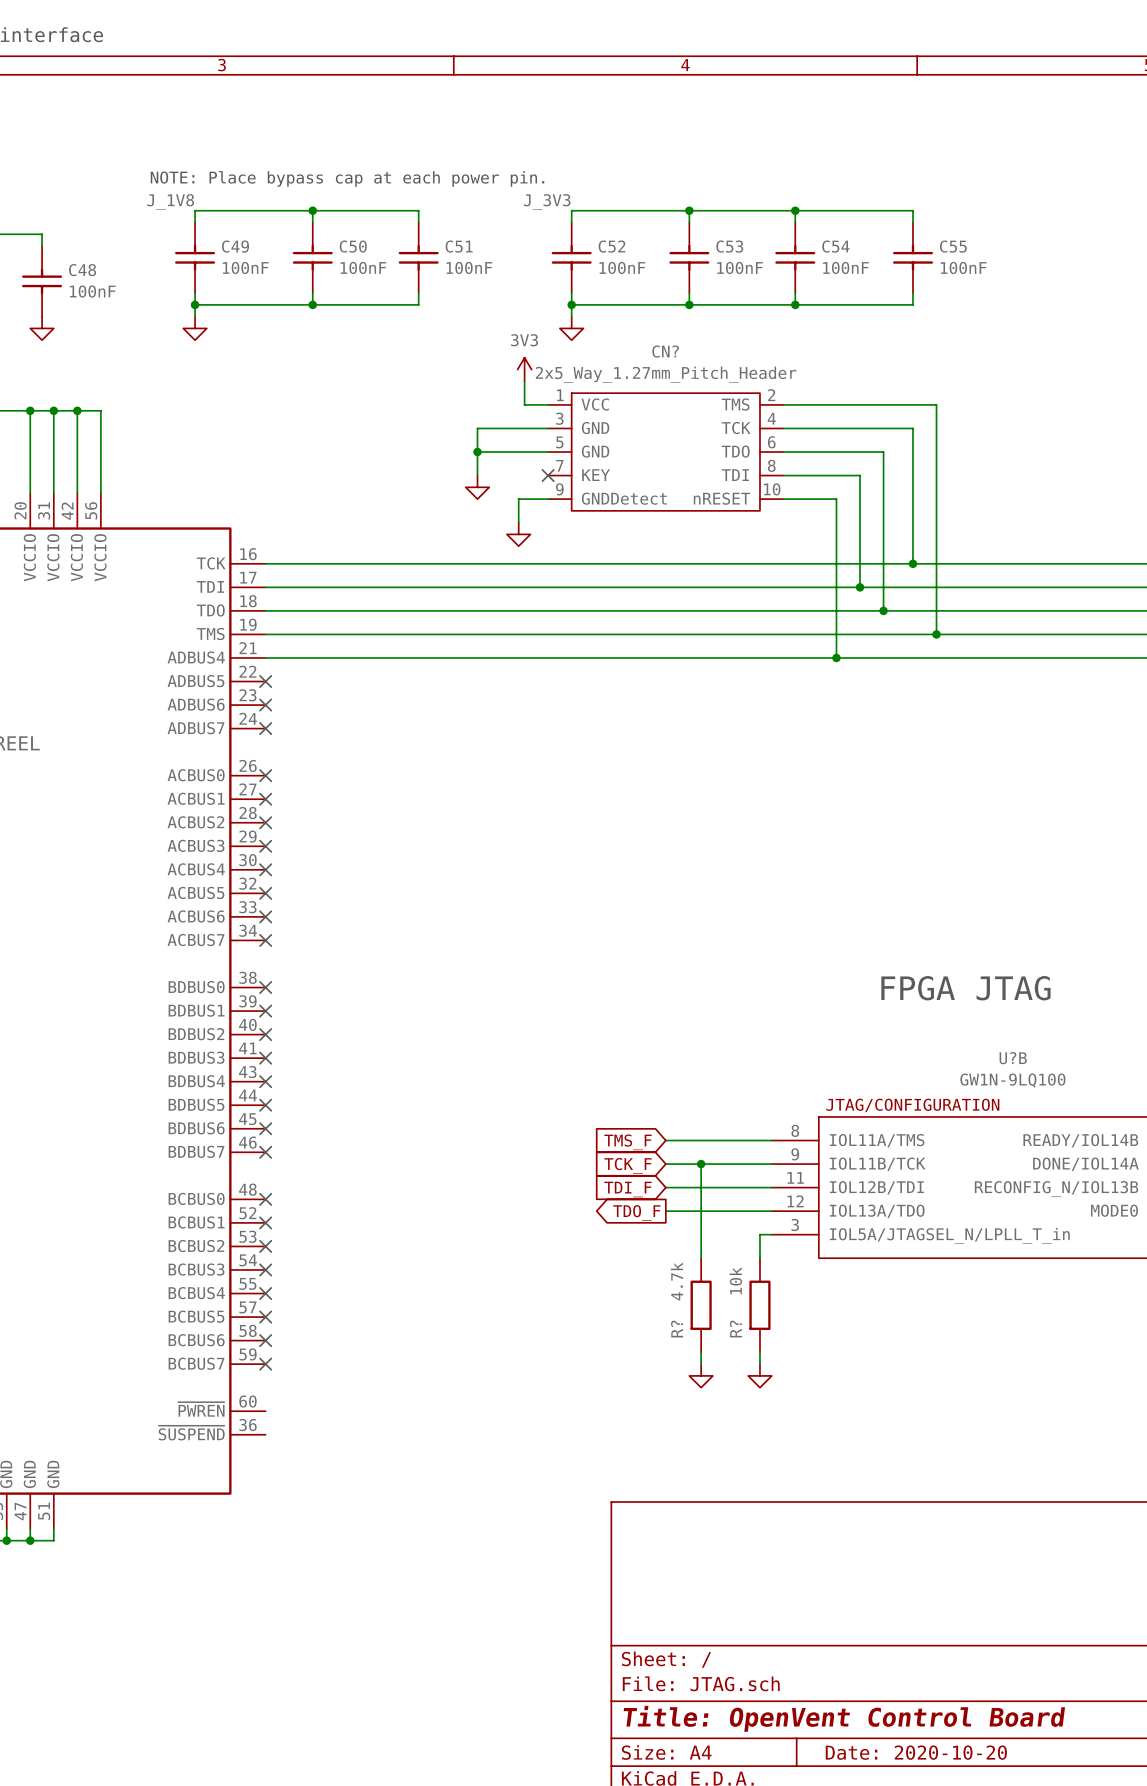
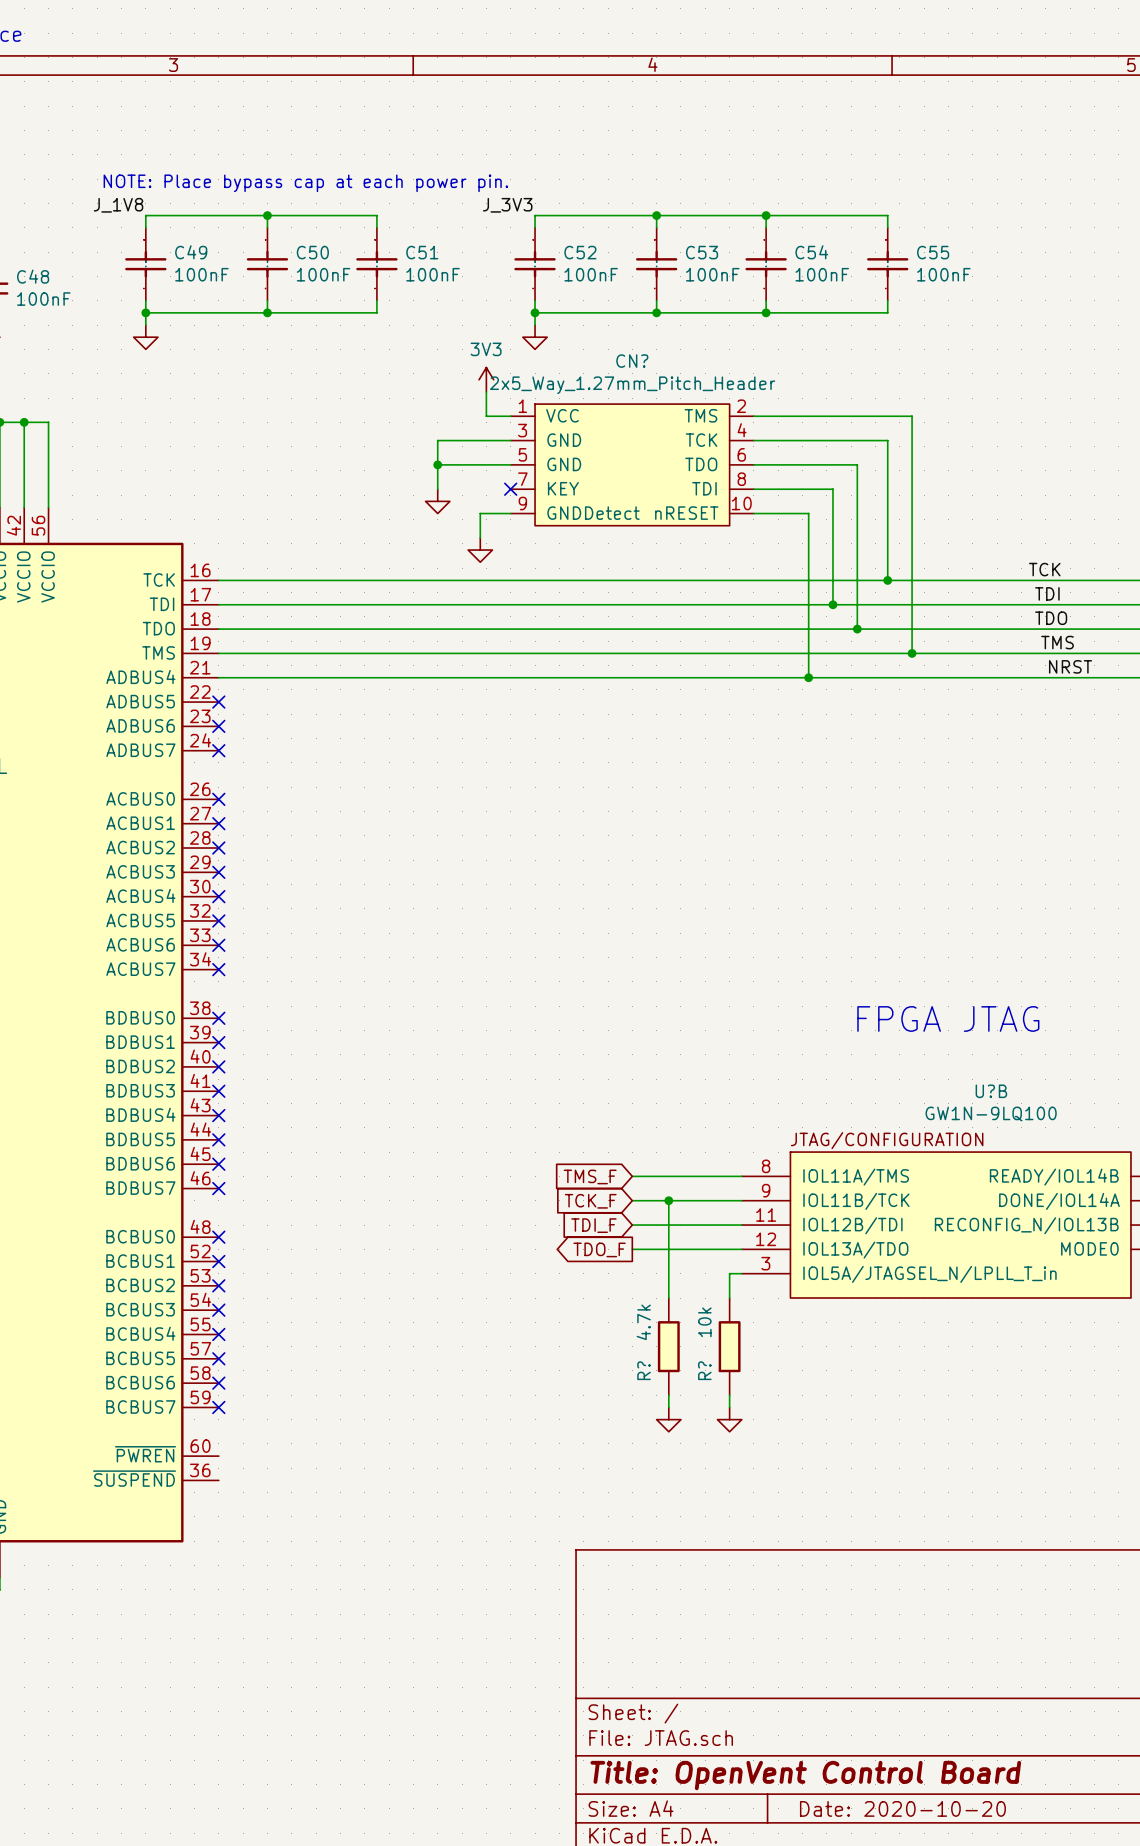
label: none -> TCK (1044, 569)
label: none -> TDI (1047, 593)
label: none -> TDO (1051, 618)
label: none -> TMS (1057, 642)
label: none -> NRST (1070, 666)

